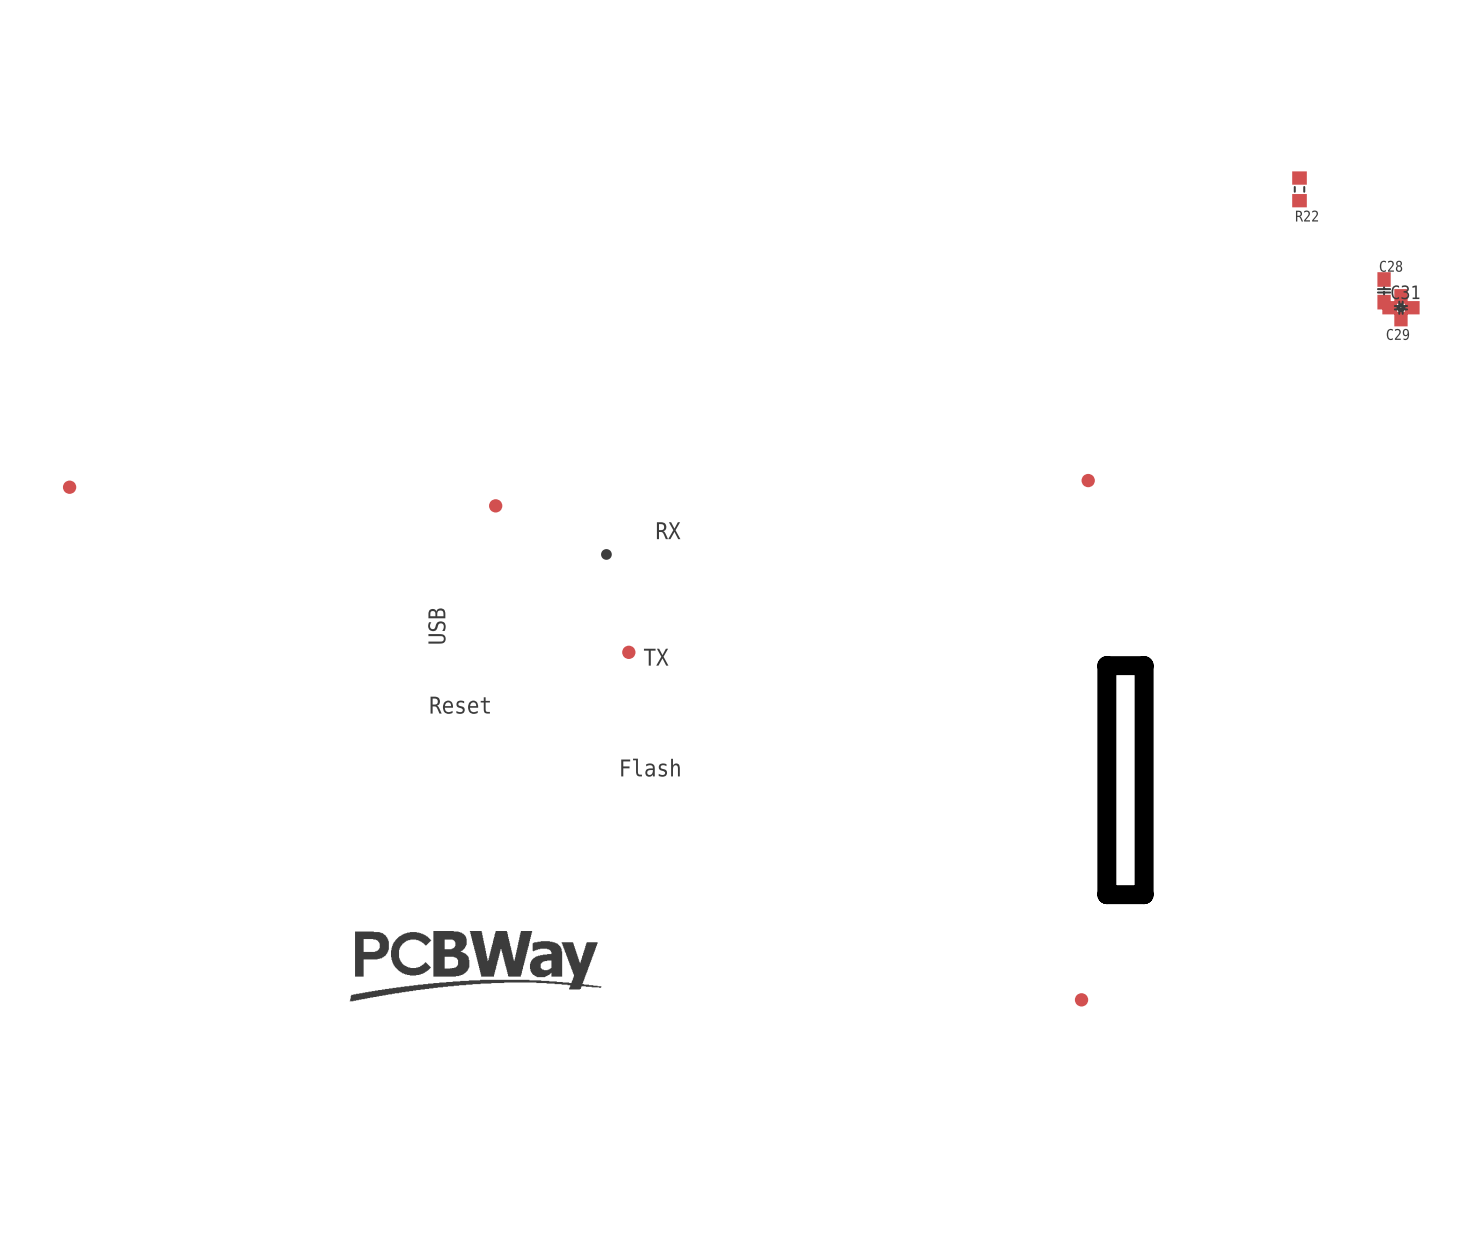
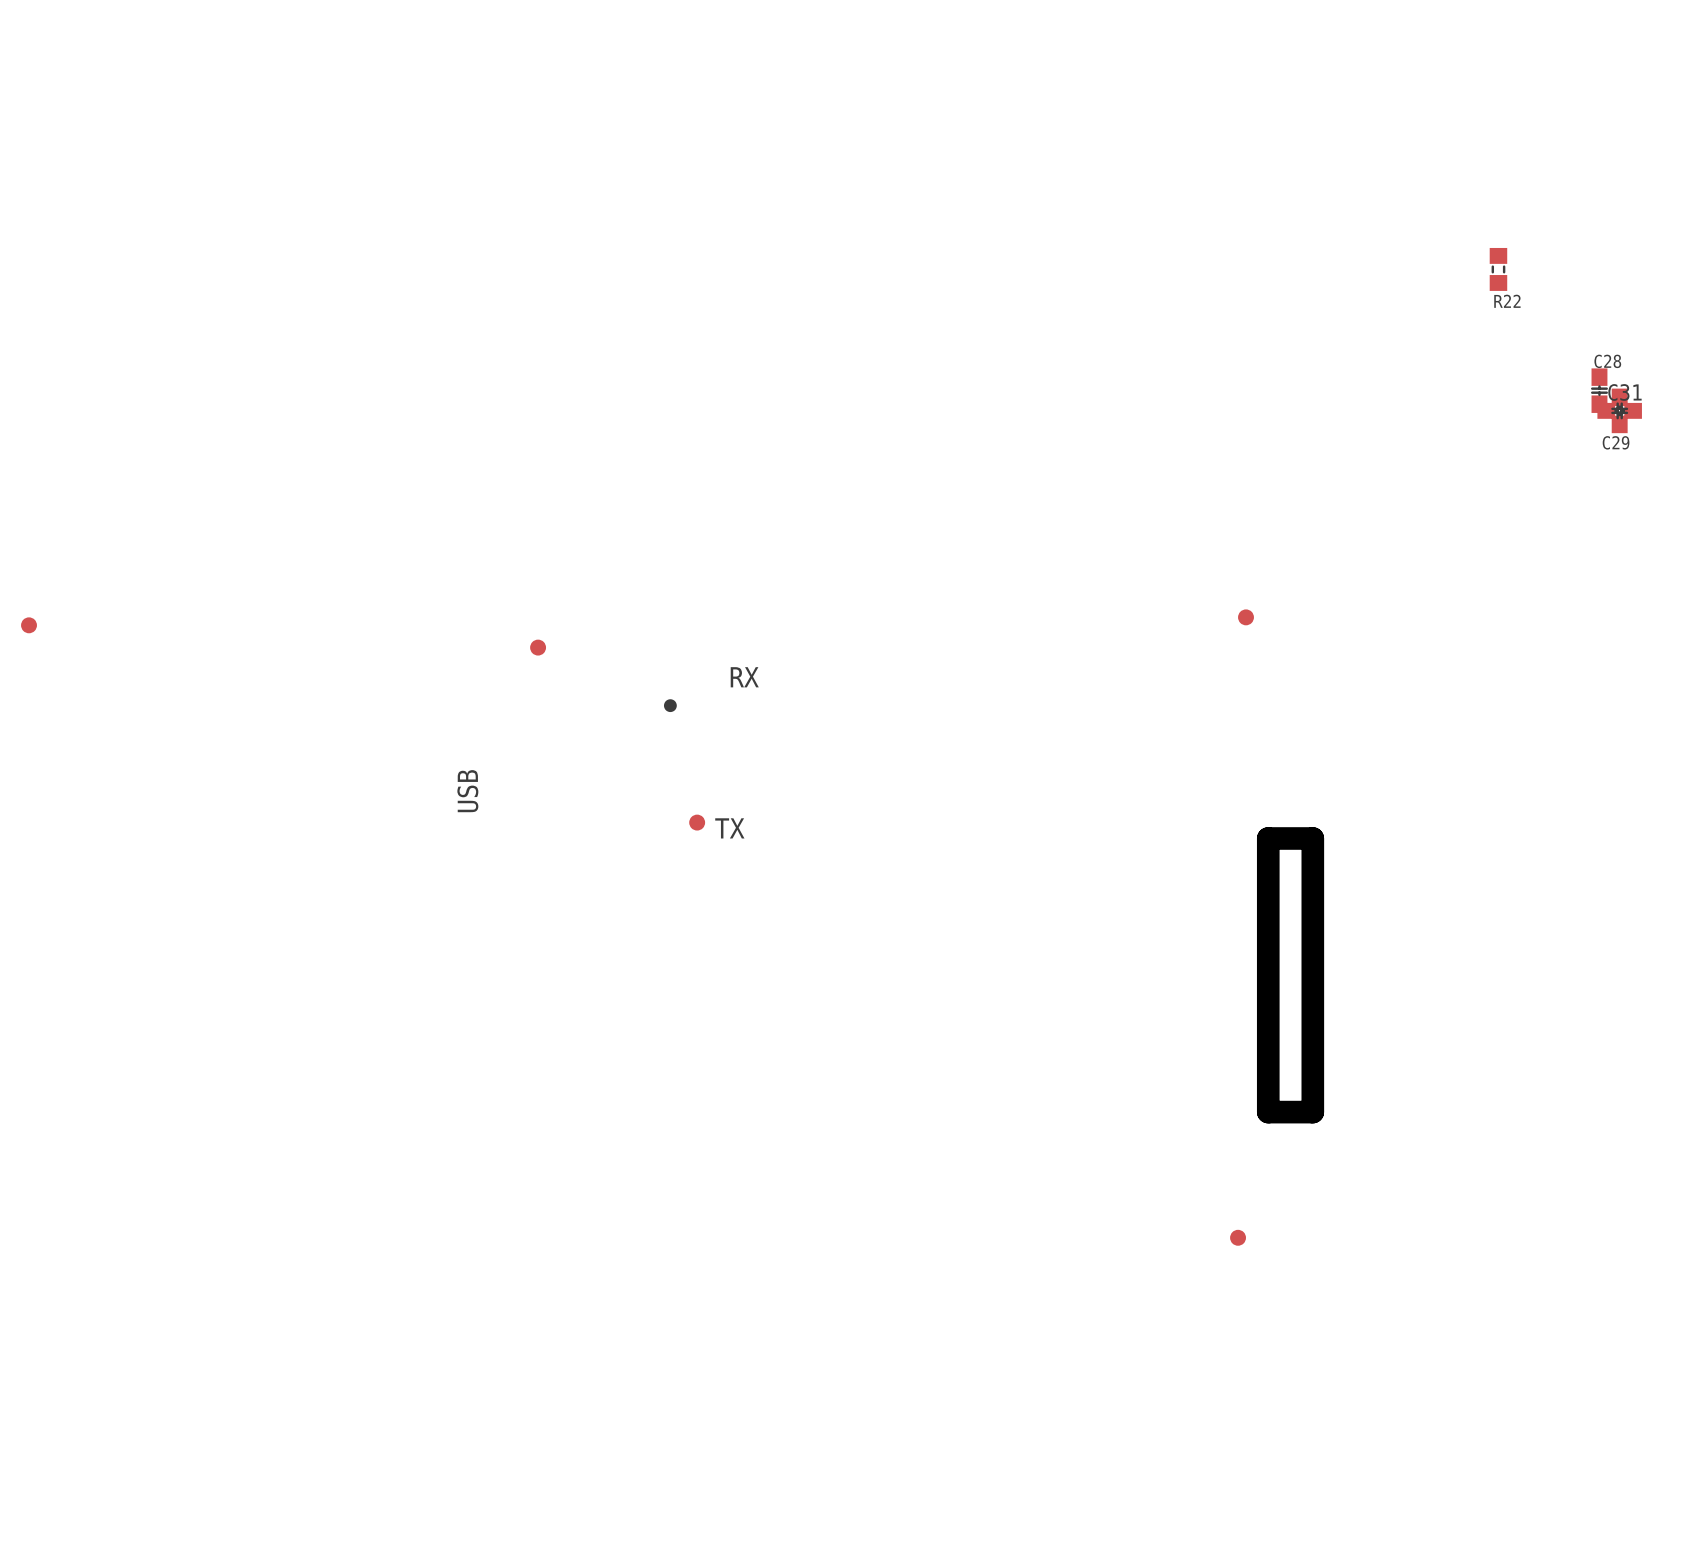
text: Reset (460, 705) -> none
text: Flash (650, 767) -> none
drawing: [349, 930, 602, 1002] -> none

